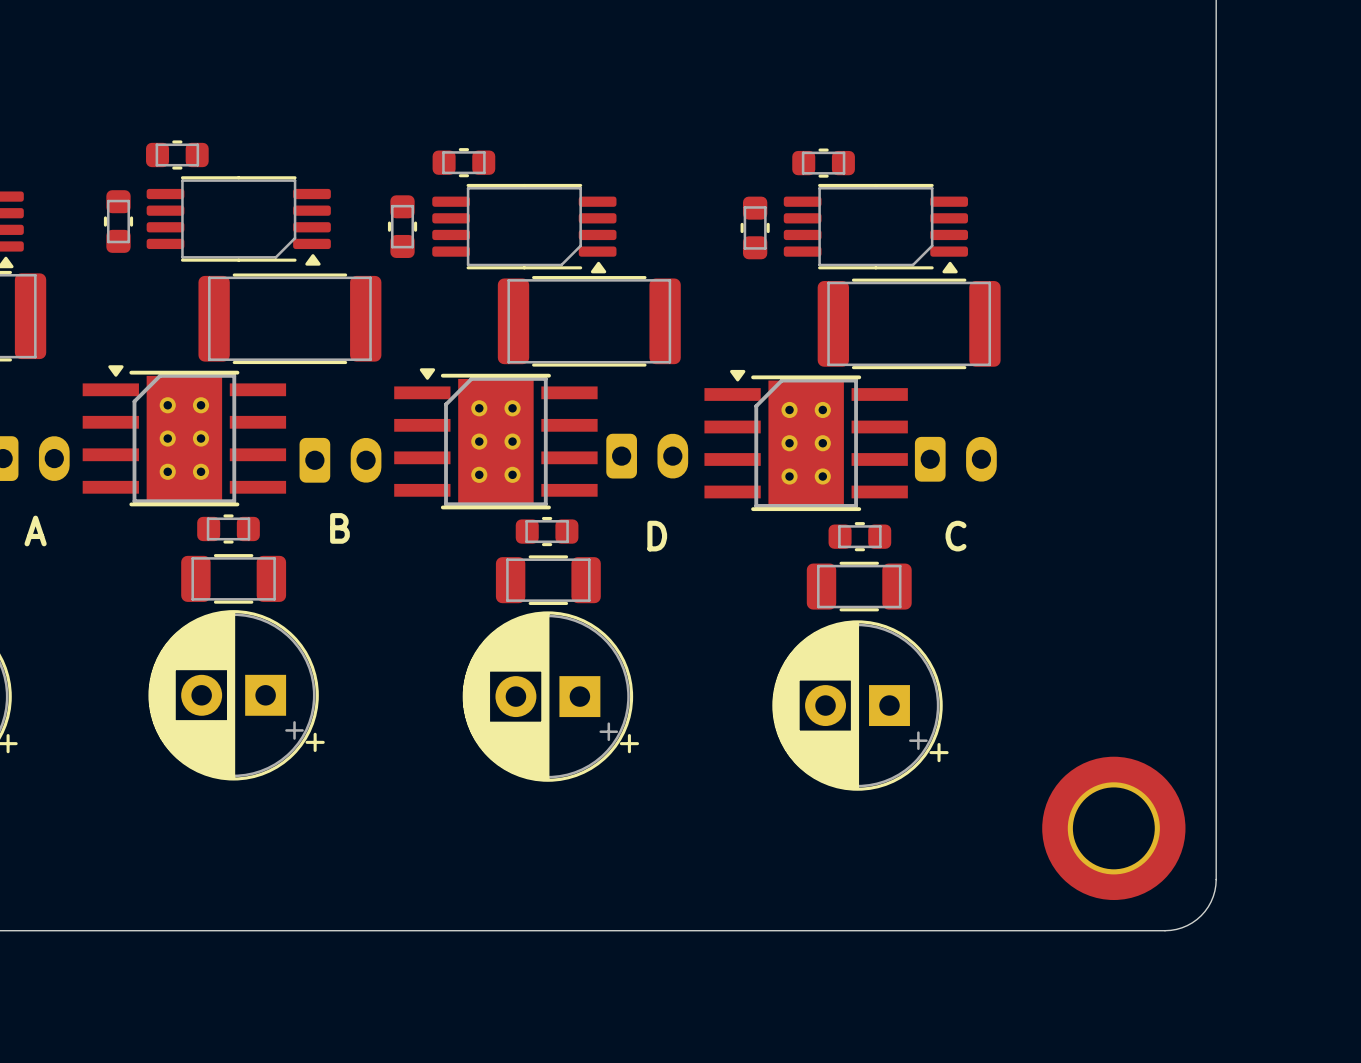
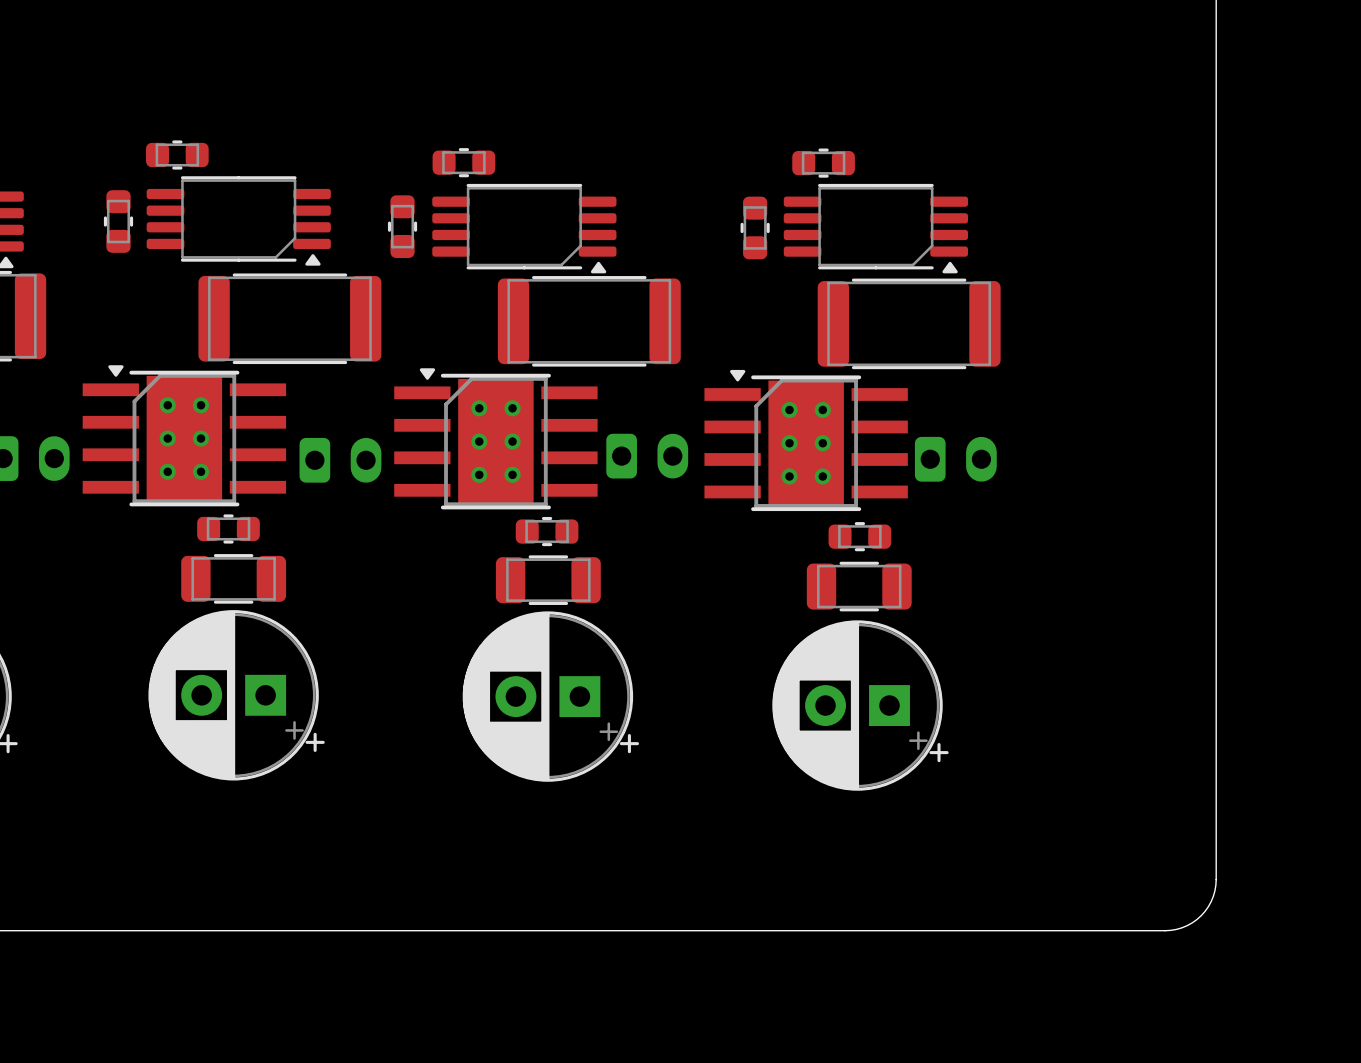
text: B (339, 528) -> none
text: A (35, 530) -> none
text: D (657, 536) -> none
text: C (956, 536) -> none
part: (1113, 828) -> none

